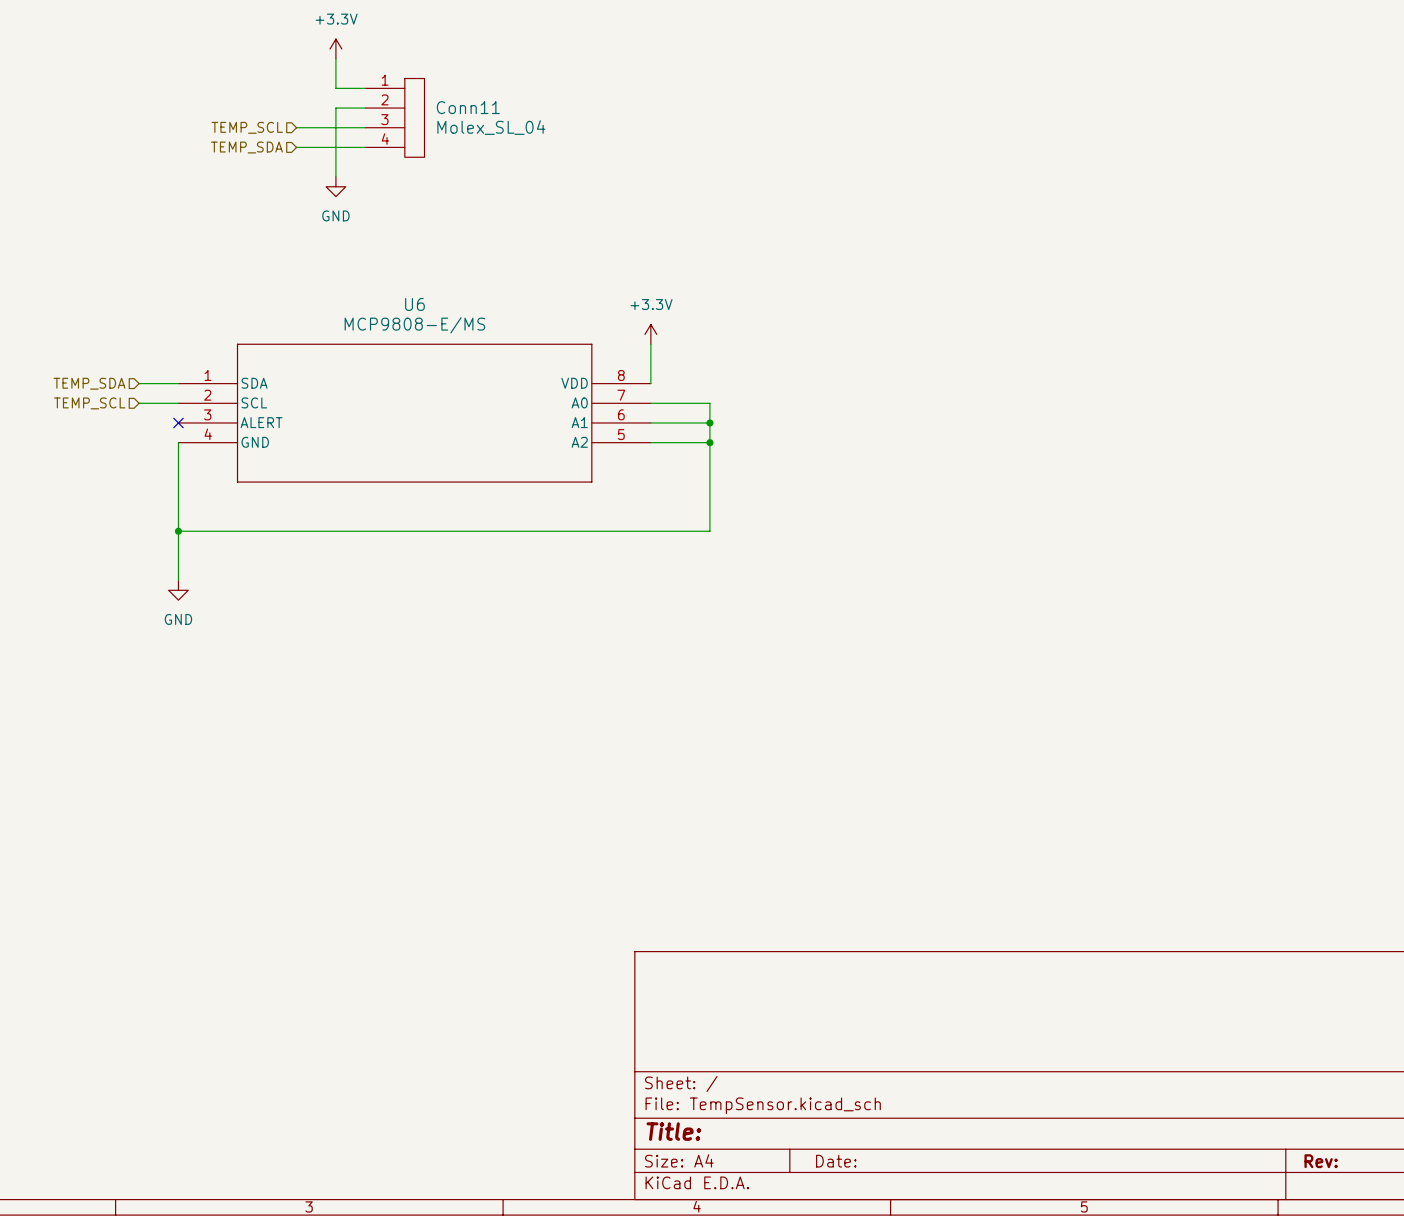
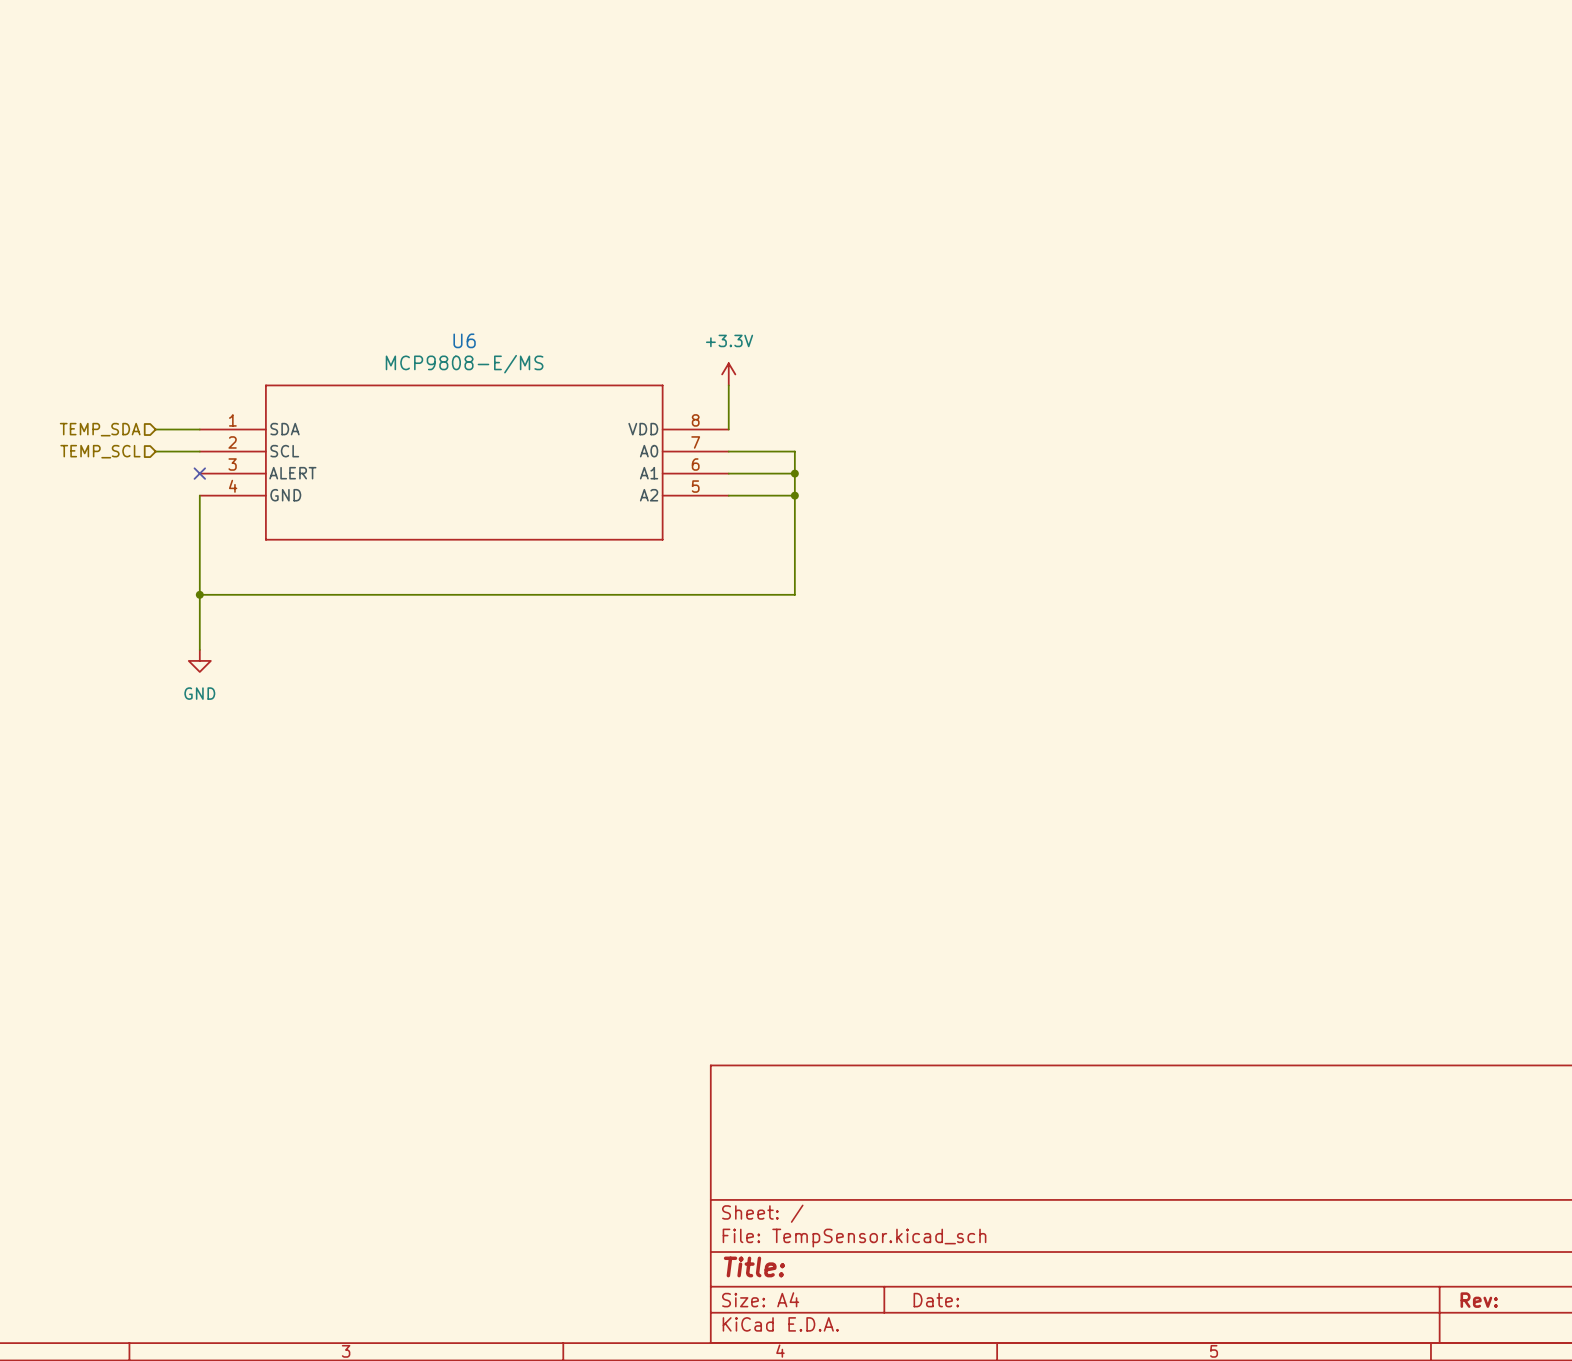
power symbol: +3.3V (335, 48) -> none
wire: (335, 58) (335, 88) (365, 88) -> none
wire: (365, 108) (335, 108) (335, 176) -> none
Conn11: Molex_SL_04 (394, 117) -> none
hierarchical label: TEMP_SCL (247, 127) -> none
wire: (296, 127) (365, 127) -> none
hierarchical label: TEMP_SDA (246, 147) -> none
wire: (296, 147) (365, 147) -> none
power symbol: GND (335, 186) -> none

